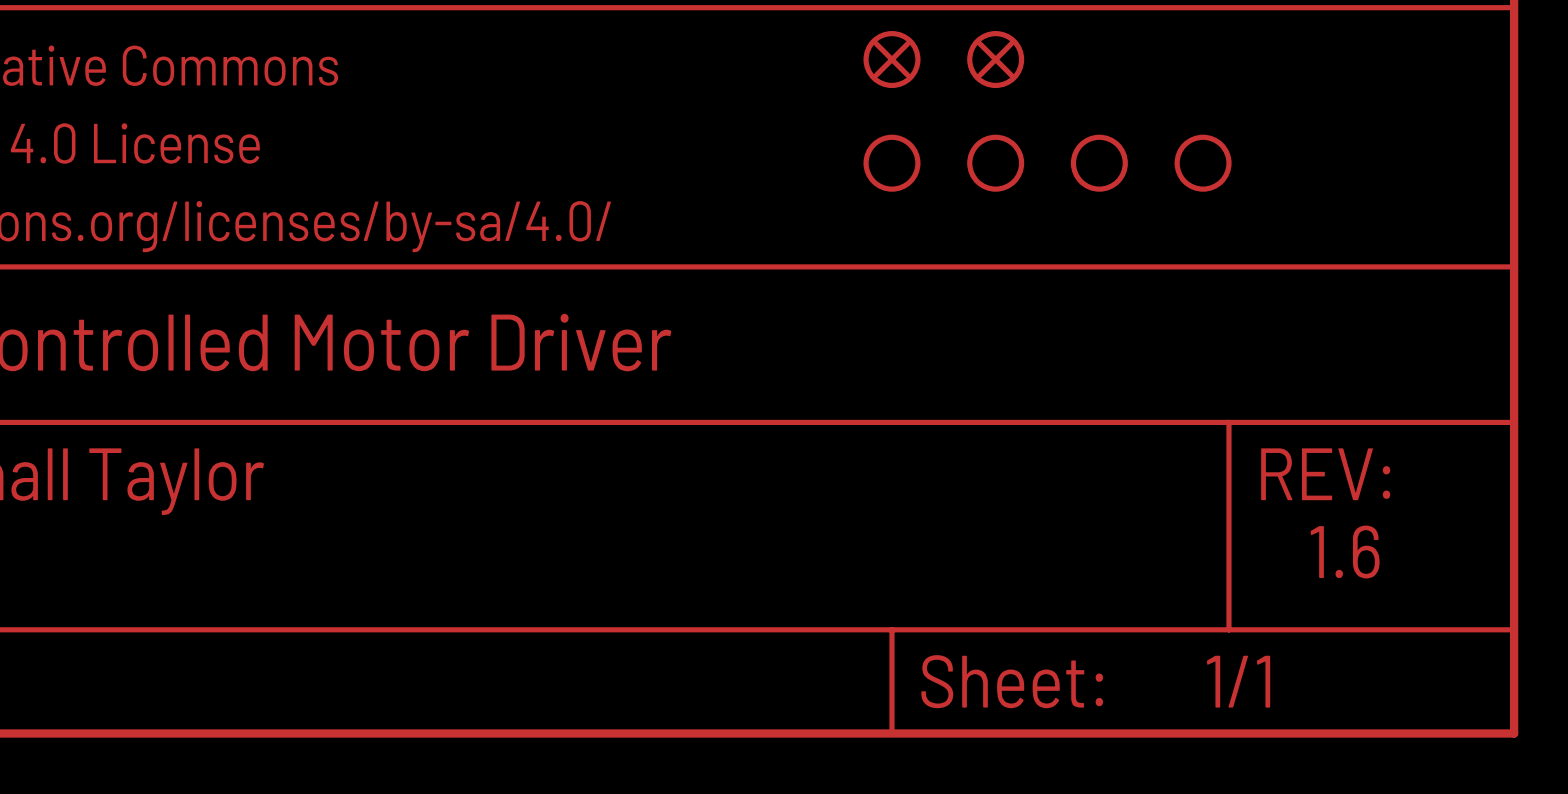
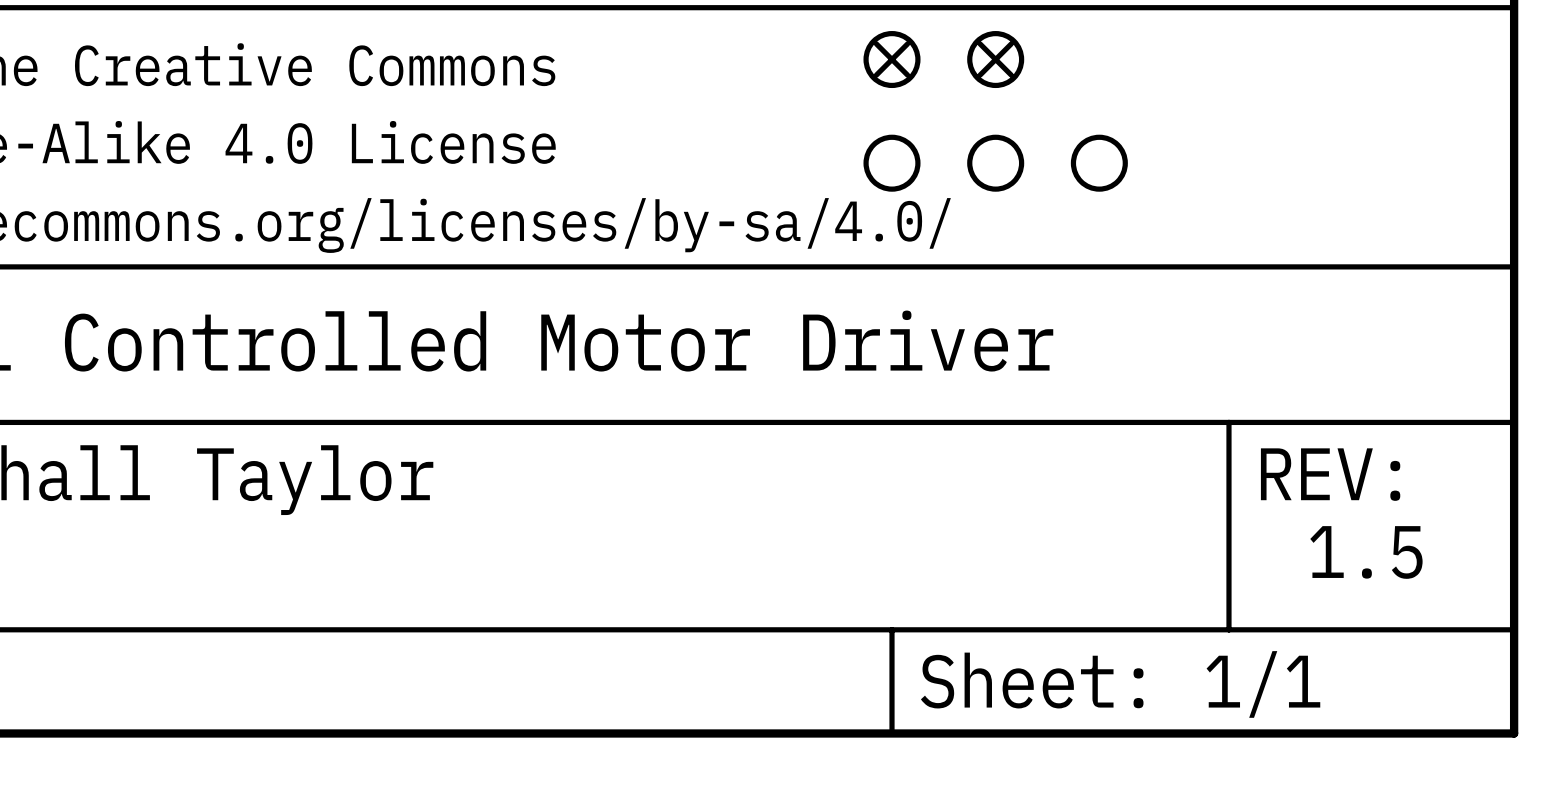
part: (1203, 163) -> none
text: 1.6 (1345, 552) -> 1.5 (1366, 552)

